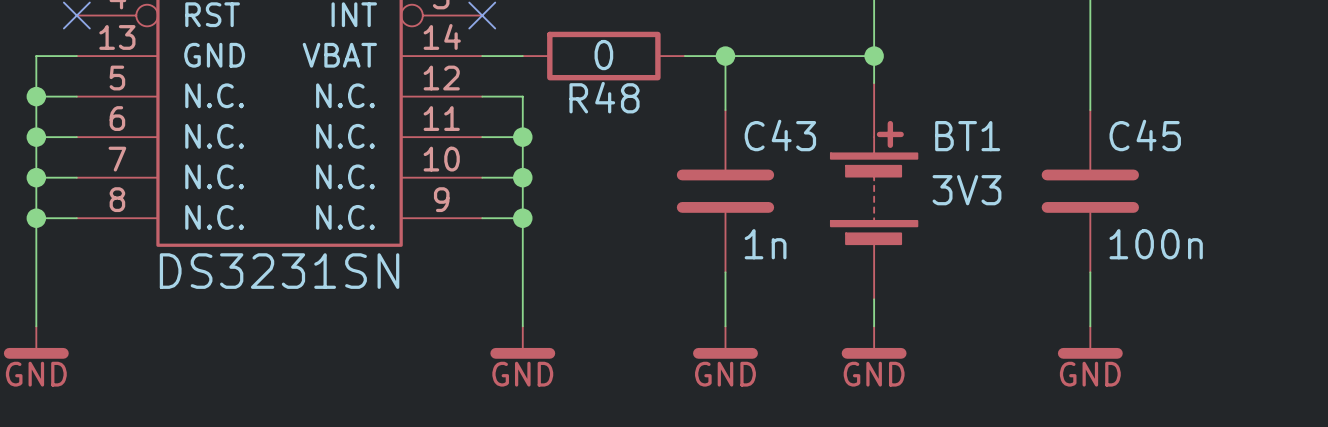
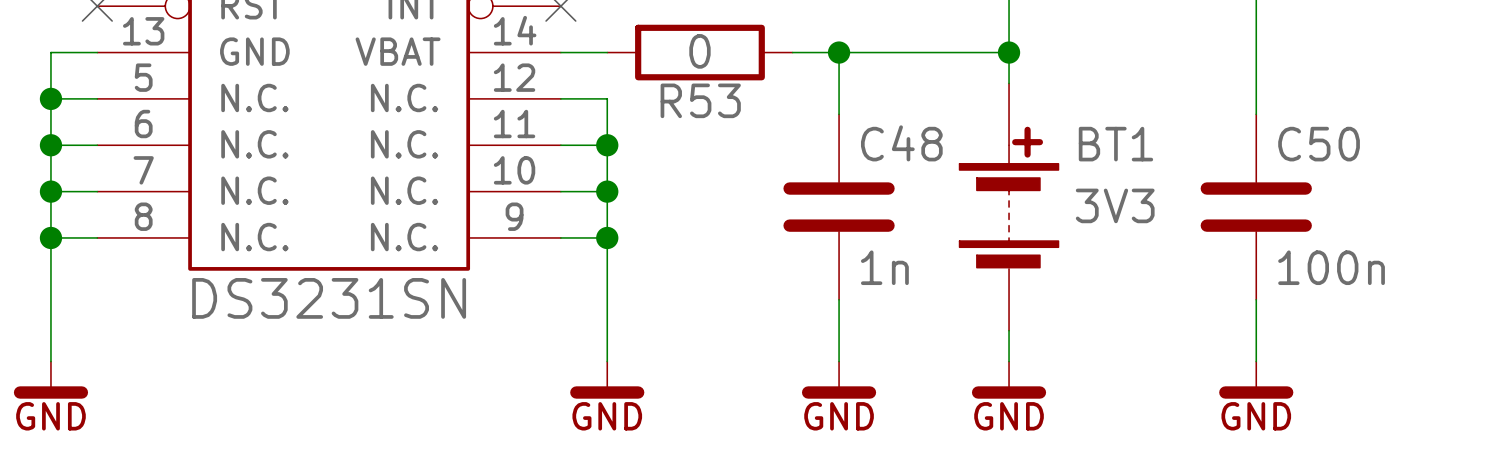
R48 name: R48 (604, 97) -> R53 (700, 100)
C43 name: C43 (780, 135) -> C48 (901, 143)
C45 name: C45 (1145, 135) -> C50 (1319, 144)

